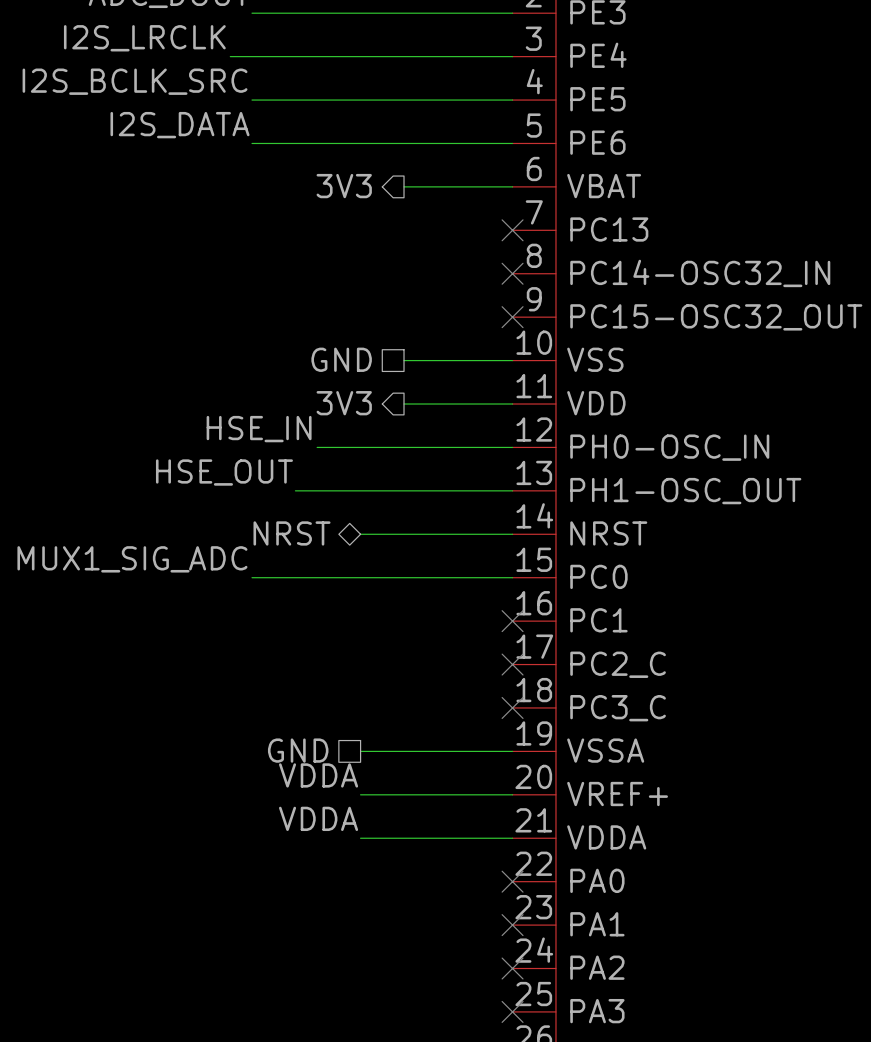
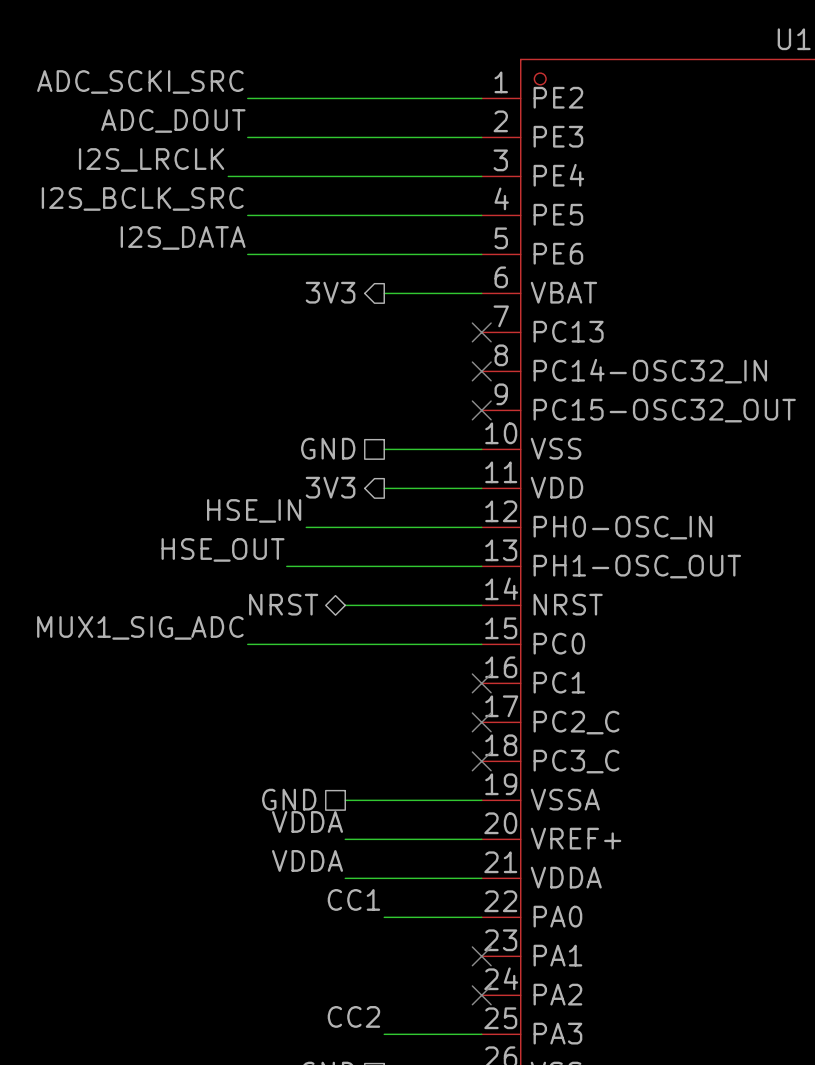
label: none -> CC1 (353, 899)
wire: none -> (384, 917) (481, 917)
no-connect mark: (512, 881) -> none
label: none -> CC2 (353, 1016)
wire: none -> (384, 1034) (481, 1034)
no-connect mark: (512, 1011) -> none

